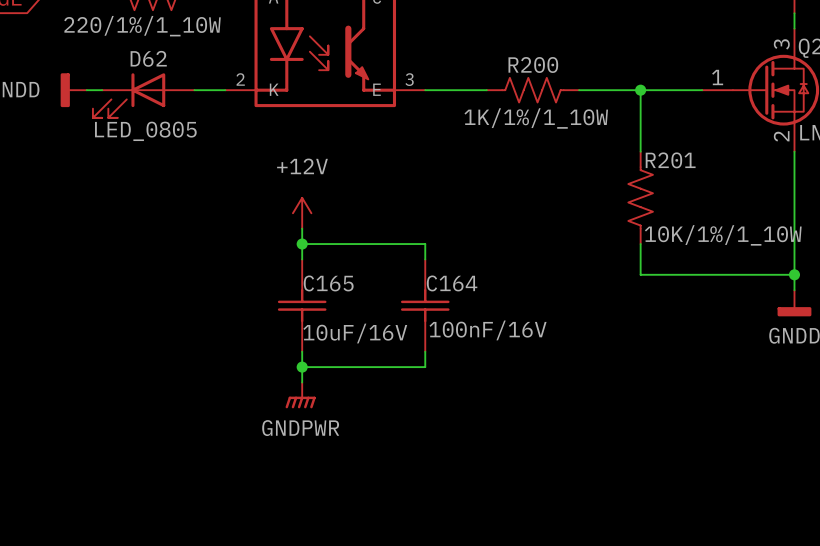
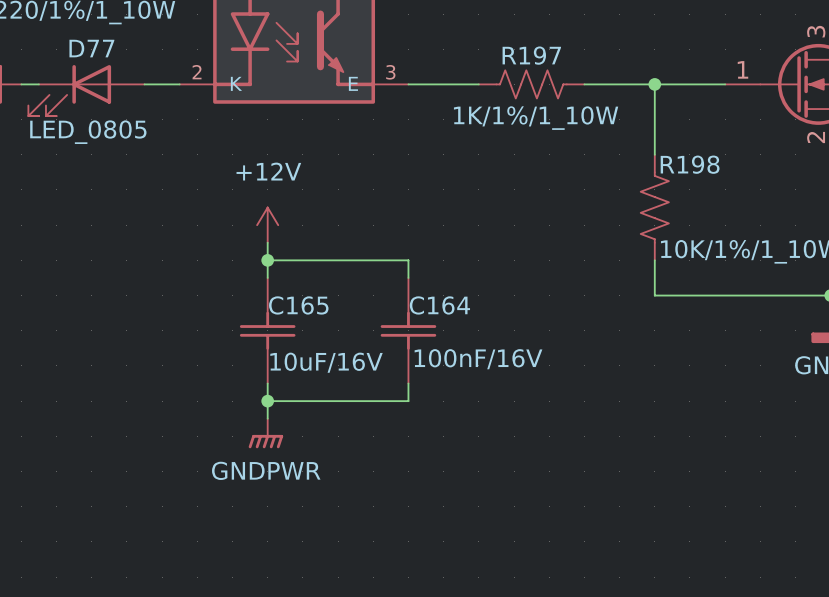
D62 name: D62 (148, 58) -> D77 (91, 48)
R200 name: R200 (533, 65) -> R197 (531, 55)
R201 name: R201 (670, 160) -> R198 (690, 164)

